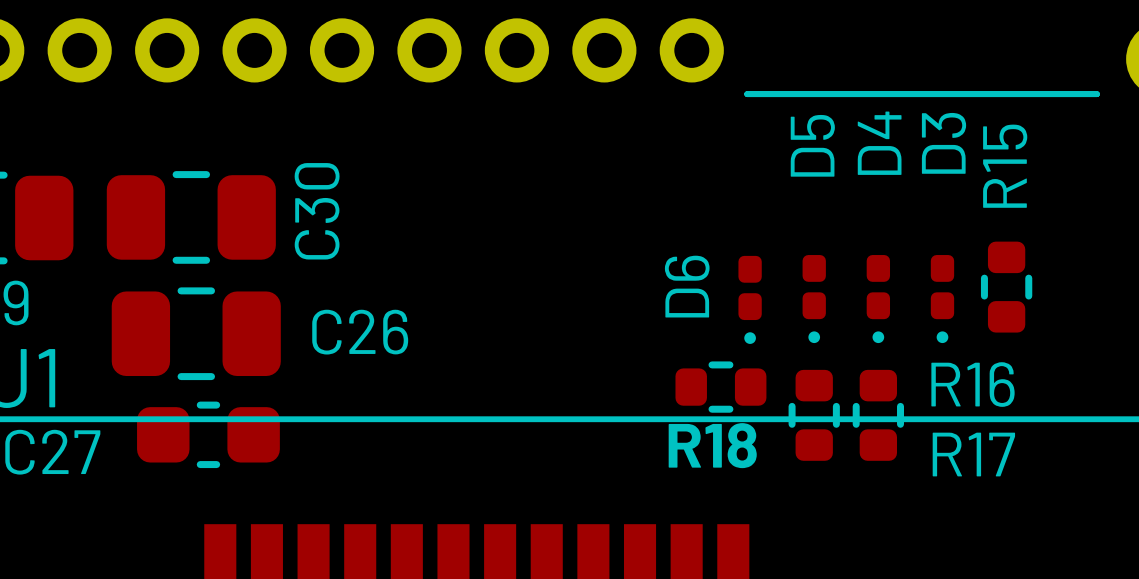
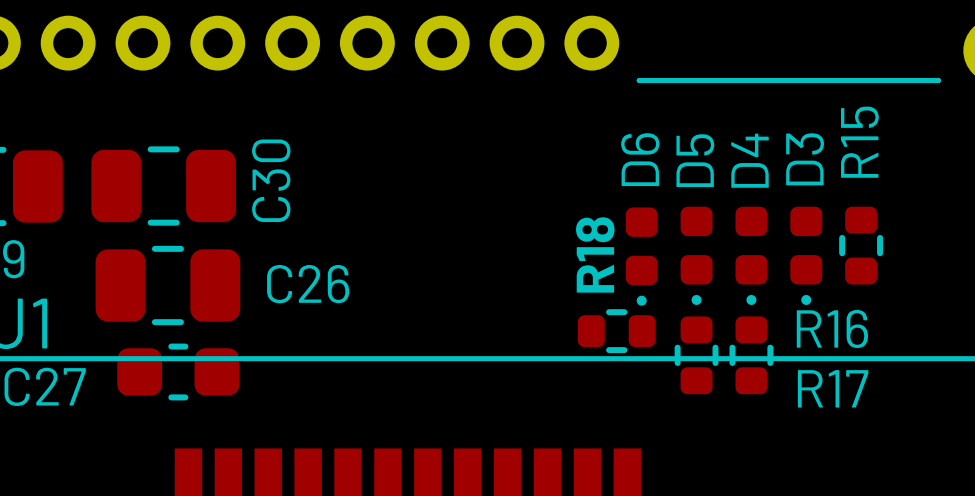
D4 name position: D4 (879, 143) -> D4 (750, 160)
D3 name position: D3 (944, 143) -> D3 (805, 159)
D5 name position: D5 (812, 145) -> D5 (695, 160)
D6 footprint: [738, 255, 762, 344] -> [625, 207, 658, 306]
D5 footprint: [802, 255, 826, 344] -> [680, 206, 713, 305]
D4 footprint: [866, 255, 891, 344] -> [735, 206, 768, 305]
D3 footprint: [930, 255, 955, 344] -> [790, 206, 823, 305]
D6 name position: D6 (687, 286) -> D6 (640, 159)
R18 name rotation: 0° (712, 445) -> 90° counterclockwise (595, 254)

